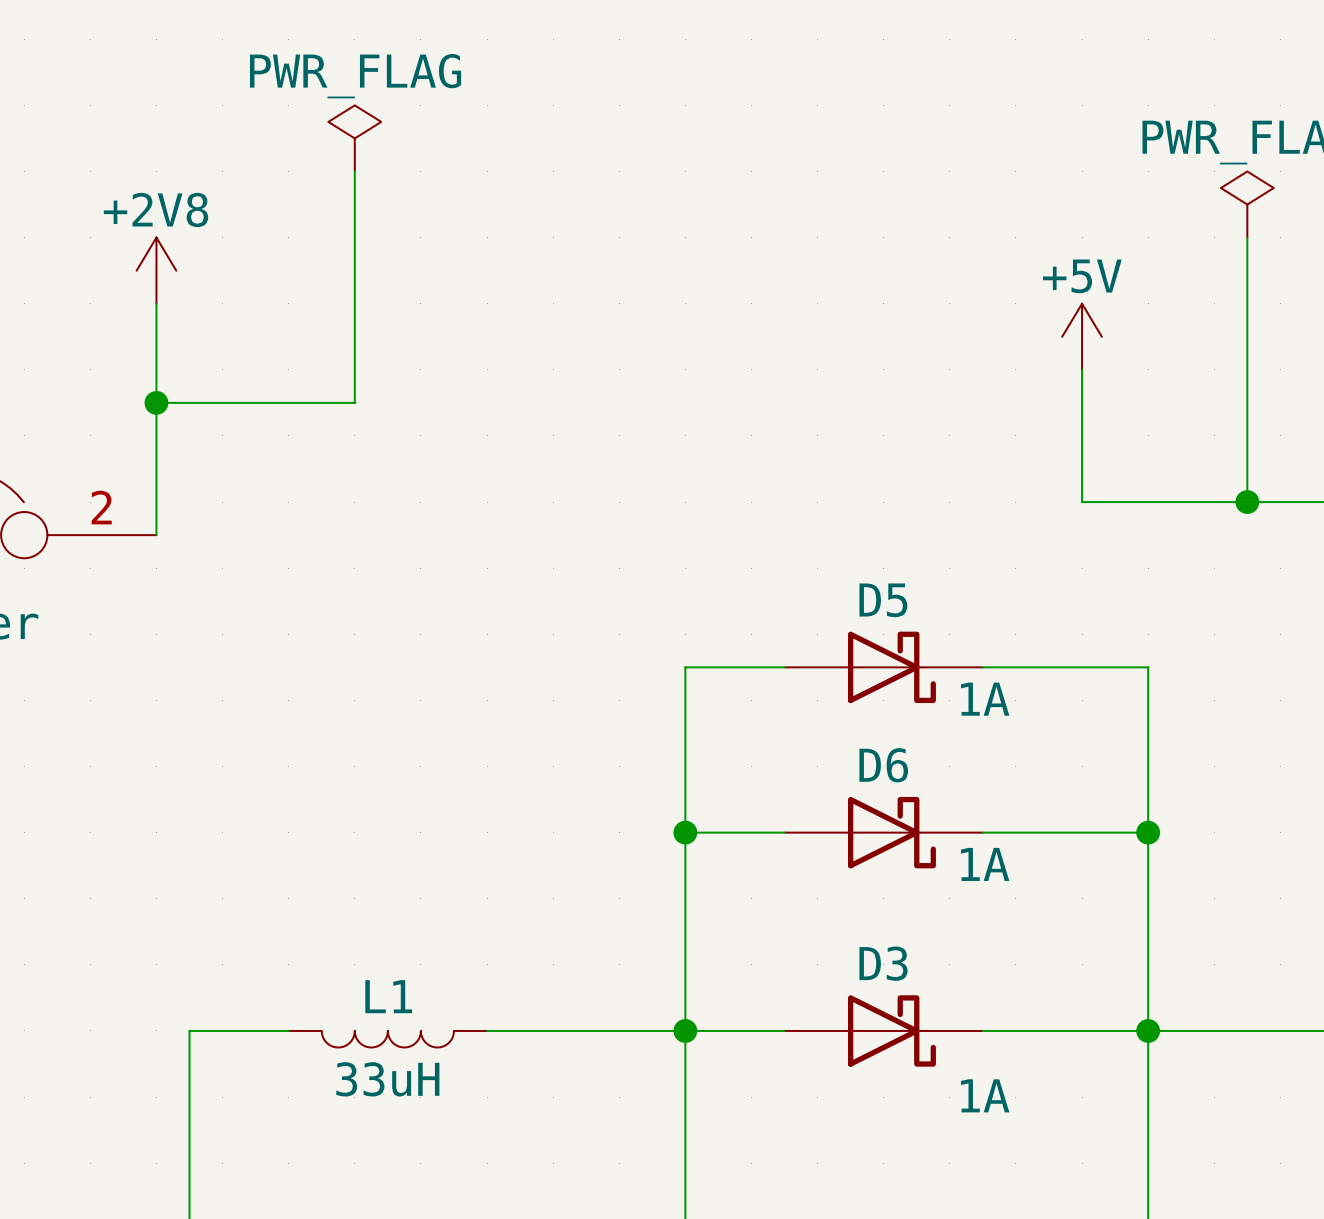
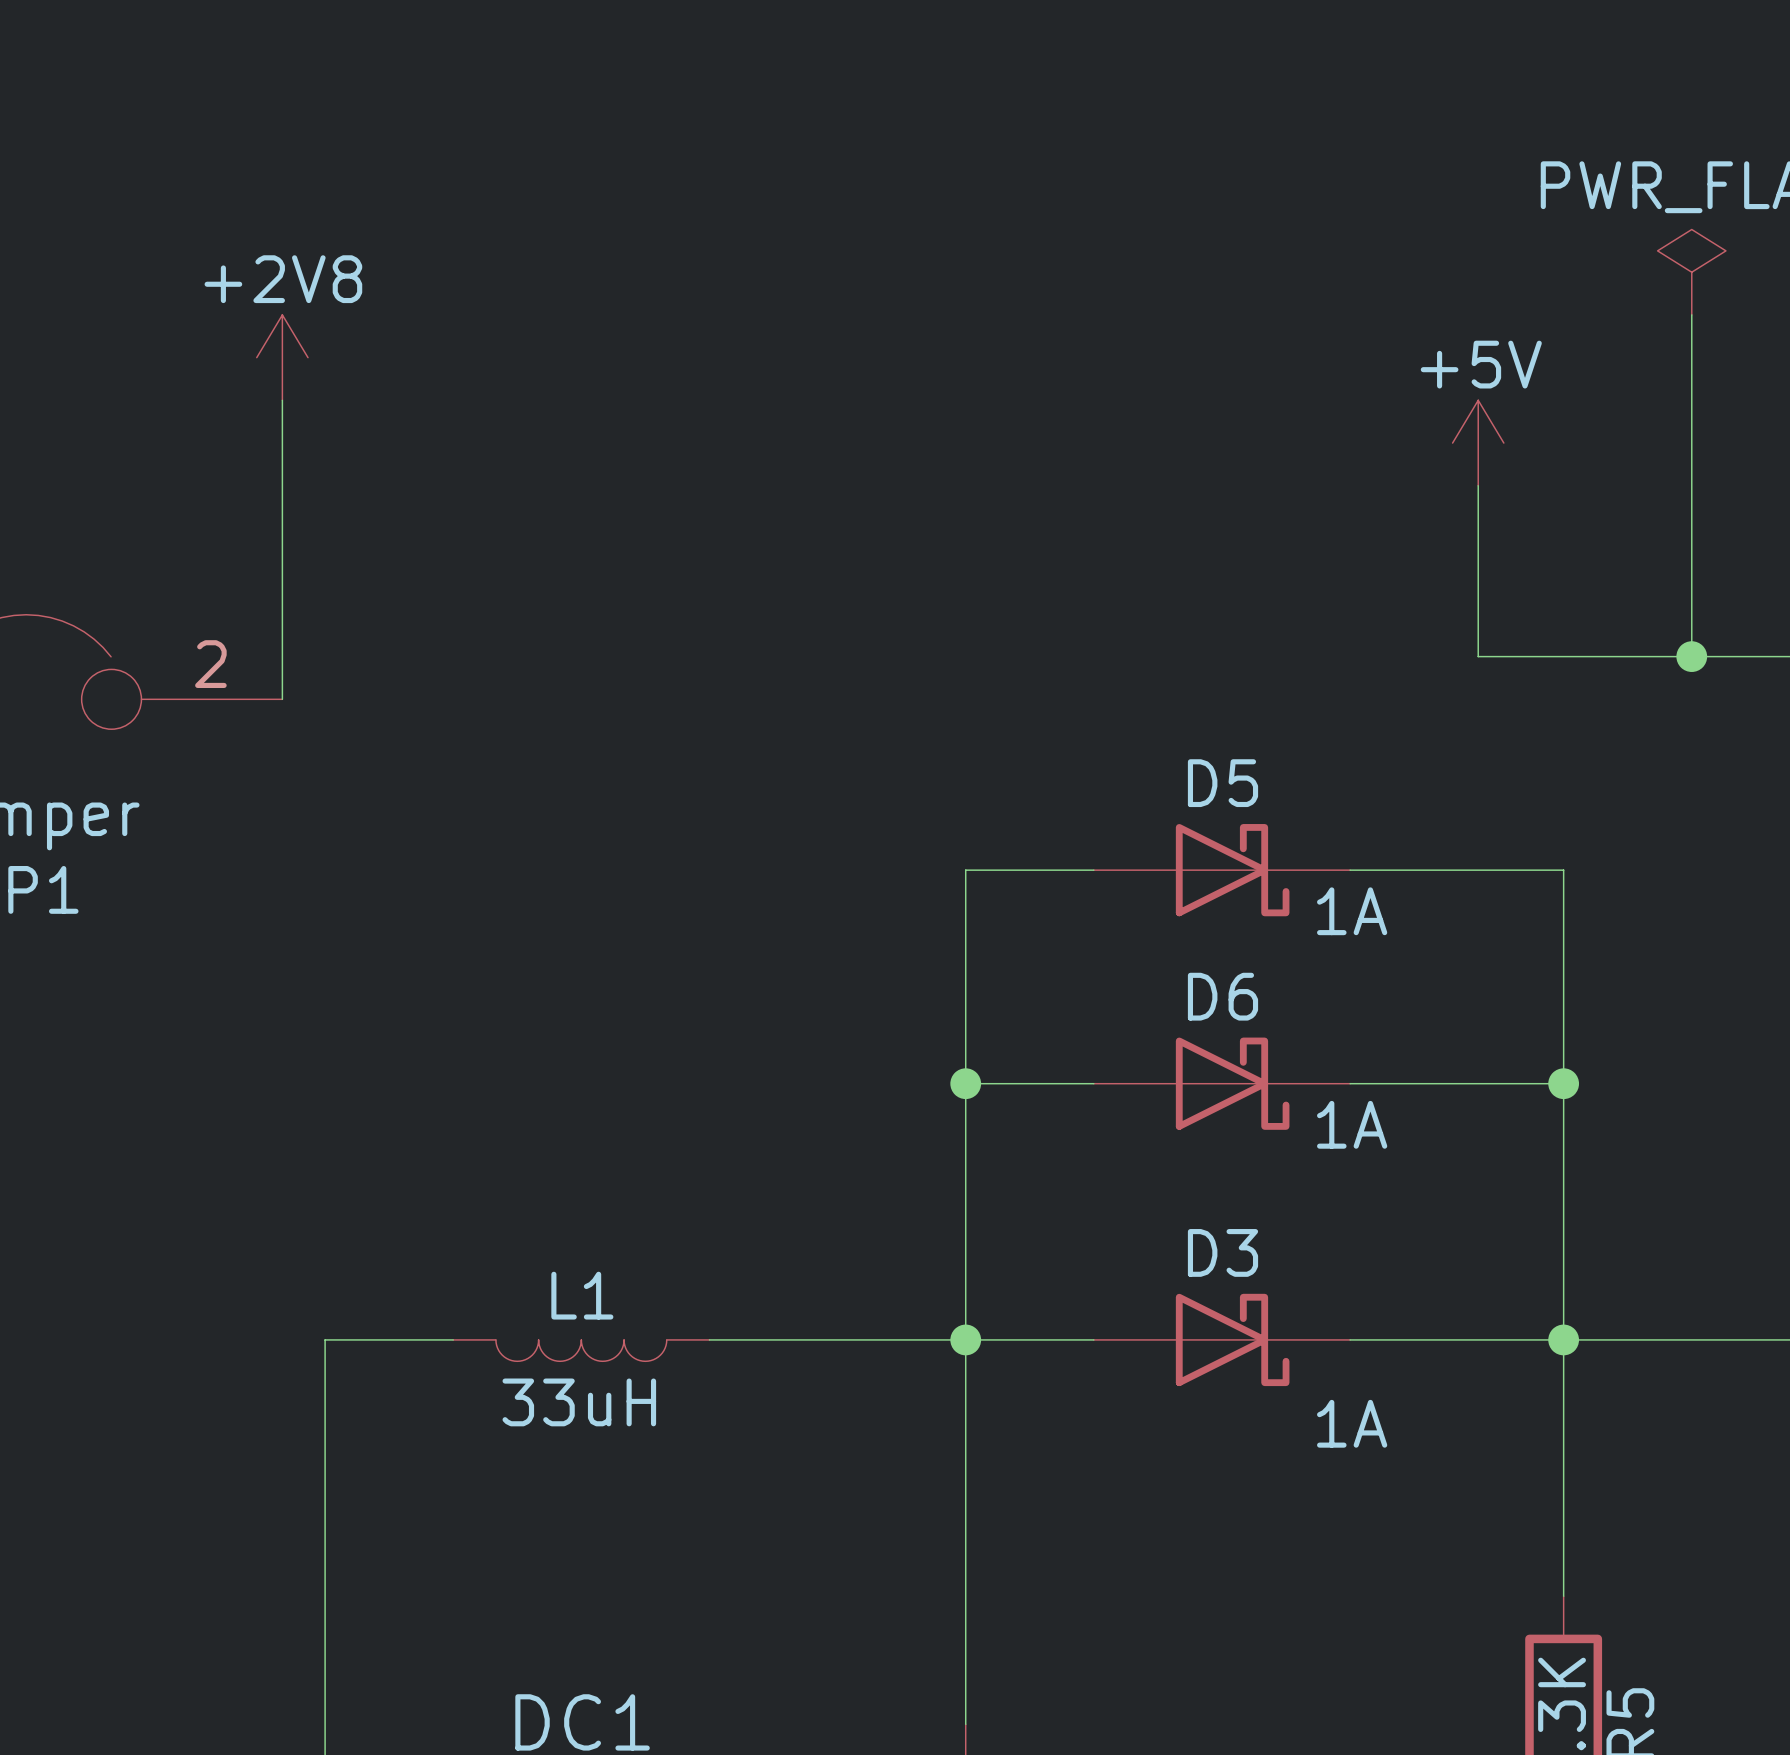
power symbol: PWR_FLAG (354, 138) -> none
wire: (354, 171) (354, 402) (156, 402) -> none
junction: (156, 402) -> none

